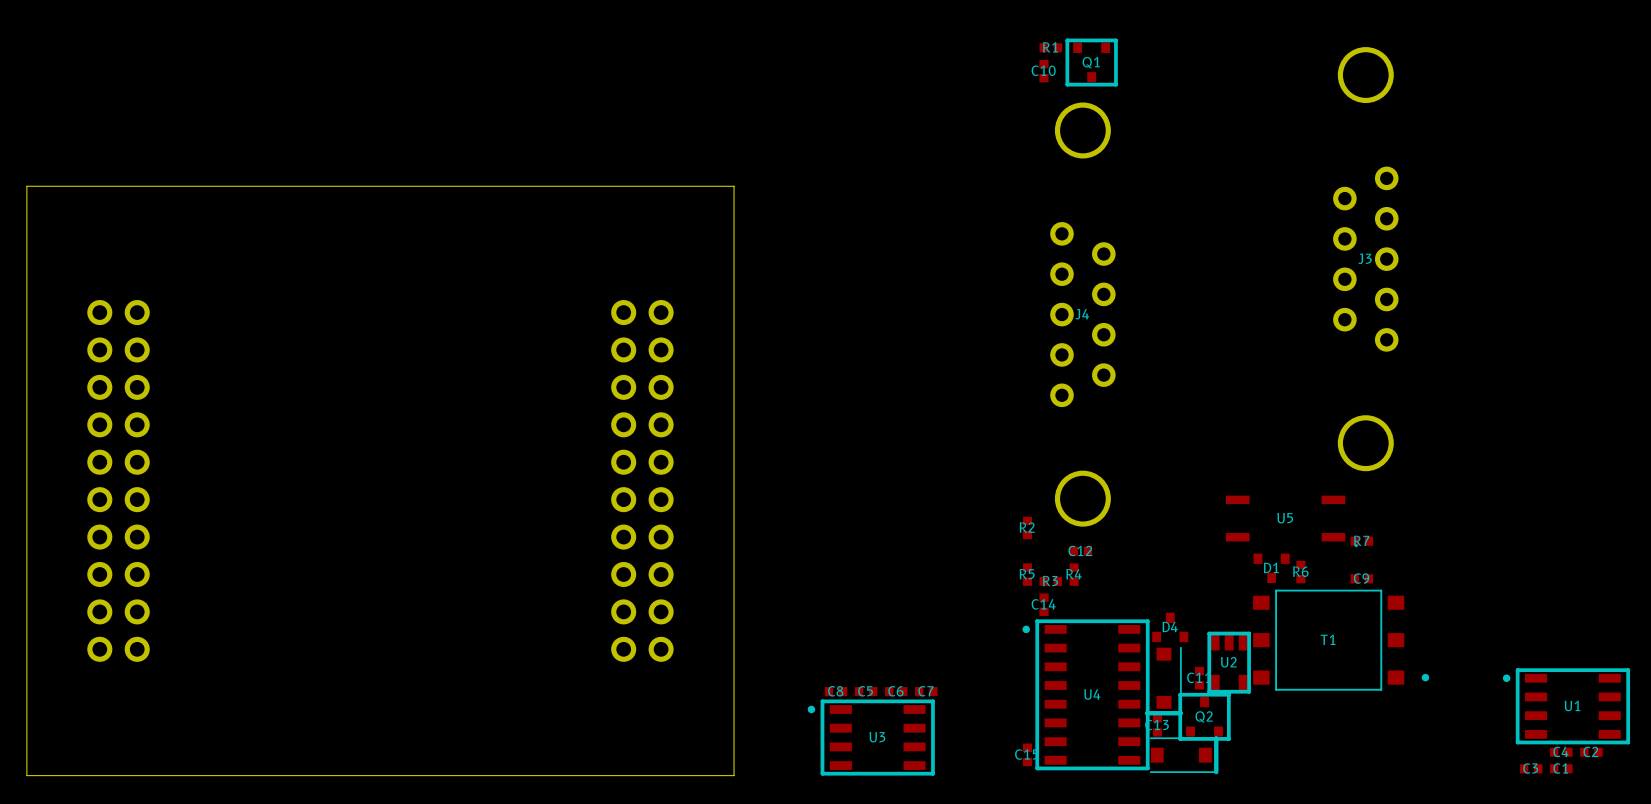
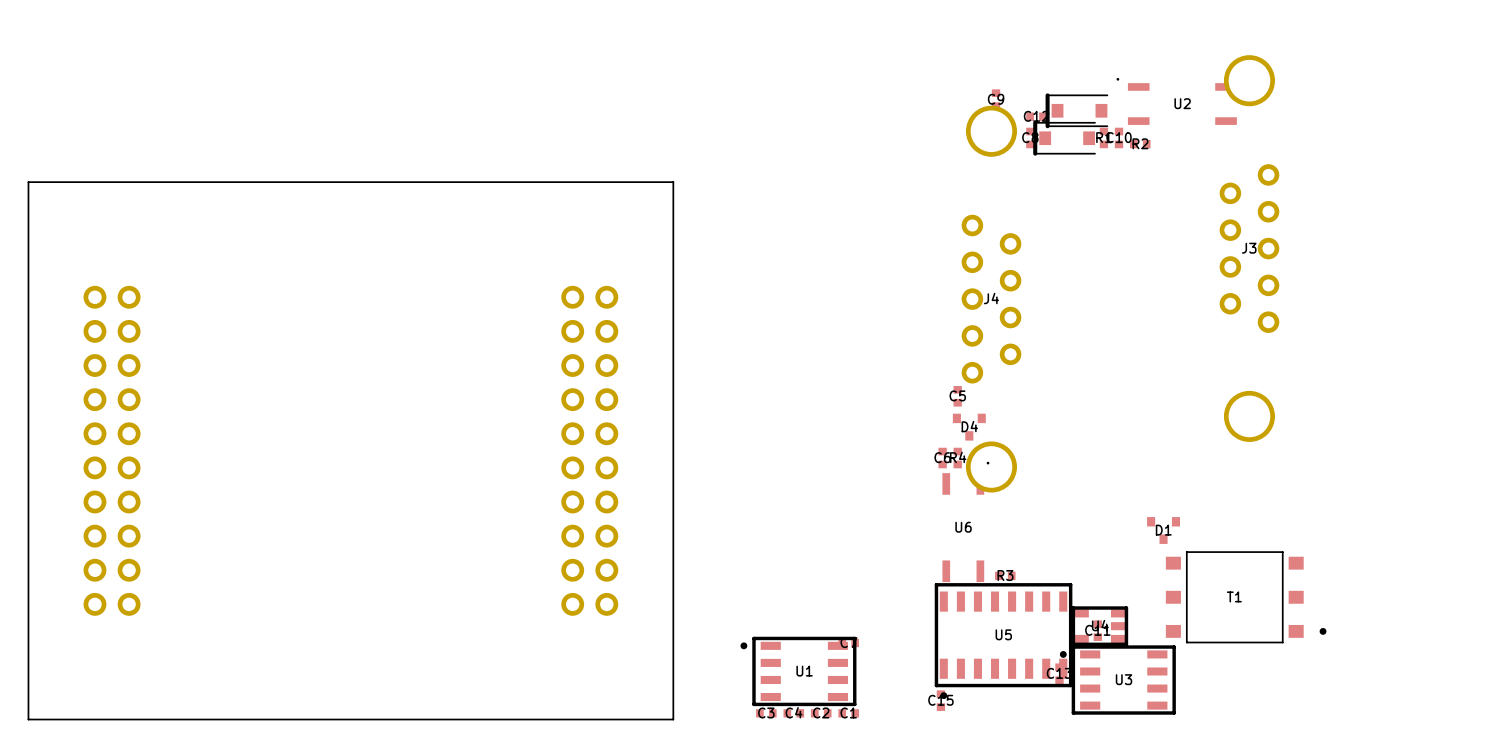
R1 rotation: 0° (1050, 47) -> 90° clockwise (1103, 137)
R1 position: (1050, 47) -> (1103, 137)
Q1: (1091, 62) -> none
C10 position: (1044, 71) -> (1119, 137)
part: none -> (1076, 110)
part: none -> (1064, 138)
U5 footprint: [1225, 495, 1358, 548] -> [934, 583, 1073, 700]
R2 rotation: 0° (1027, 527) -> 90° clockwise (1140, 144)
R2 position: (1027, 527) -> (1140, 144)
R7: (1361, 541) -> none
C12 position: (1080, 551) -> (1036, 116)
U6: none -> (965, 521)
R6: (1300, 572) -> none
R5: (1027, 574) -> none
R4 position: (1074, 574) -> (957, 458)
C9 rotation: 0° (1361, 578) -> 90° clockwise (996, 99)
C9 position: (1361, 578) -> (996, 99)
R3 position: (1050, 581) -> (1005, 575)
C14: (1044, 604) -> none
U4 footprint: [1022, 619, 1150, 771] -> [1071, 606, 1129, 647]
D4 rotation: 0° (1170, 627) -> 180° (969, 427)
D4 position: (1170, 627) -> (969, 427)
U2 footprint: [1207, 631, 1251, 694] -> [1116, 77, 1237, 125]
T1 position: (1341, 640) -> (1246, 597)
part: (1163, 681) -> none
C8 rotation: 0° (836, 691) -> 90° clockwise (1030, 137)
C8 position: (836, 691) -> (1030, 137)
C5 rotation: 0° (866, 691) -> 90° clockwise (957, 396)
C5 position: (866, 691) -> (957, 396)
C6 rotation: 0° (896, 691) -> 90° clockwise (942, 458)
C6 position: (896, 691) -> (942, 458)
U1 position: (1566, 706) -> (798, 671)
Q2: (1204, 716) -> none
U3 position: (871, 737) -> (1117, 680)
C4 position: (1561, 752) -> (793, 713)
C2 position: (1591, 752) -> (821, 713)
part: (1184, 755) -> none
C3 position: (1531, 768) -> (766, 713)
C1 position: (1561, 768) -> (848, 713)

